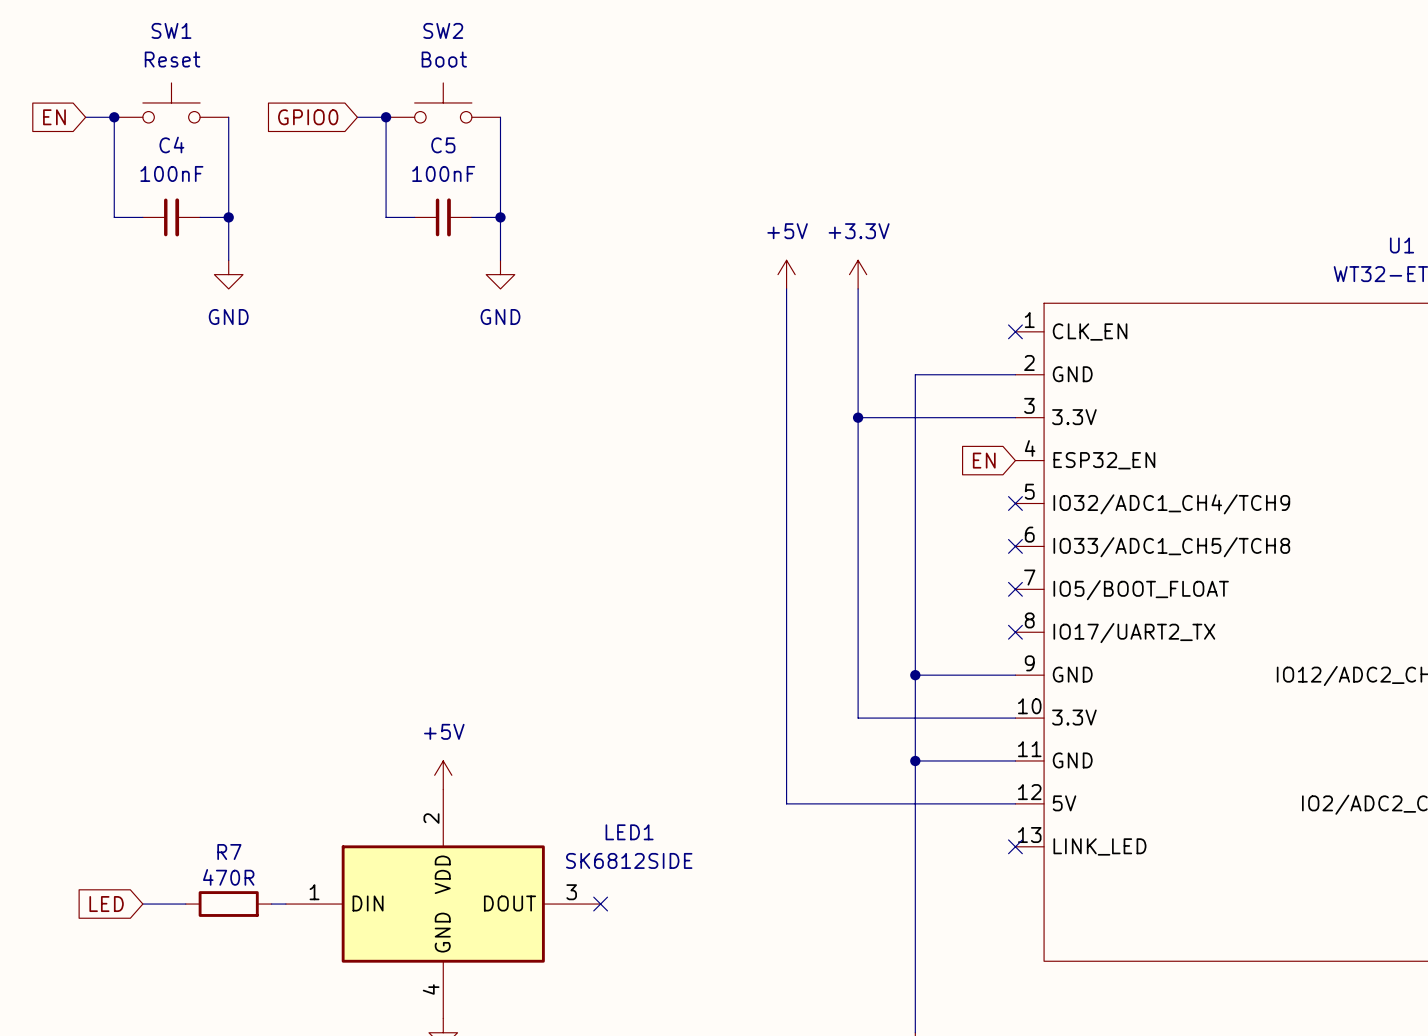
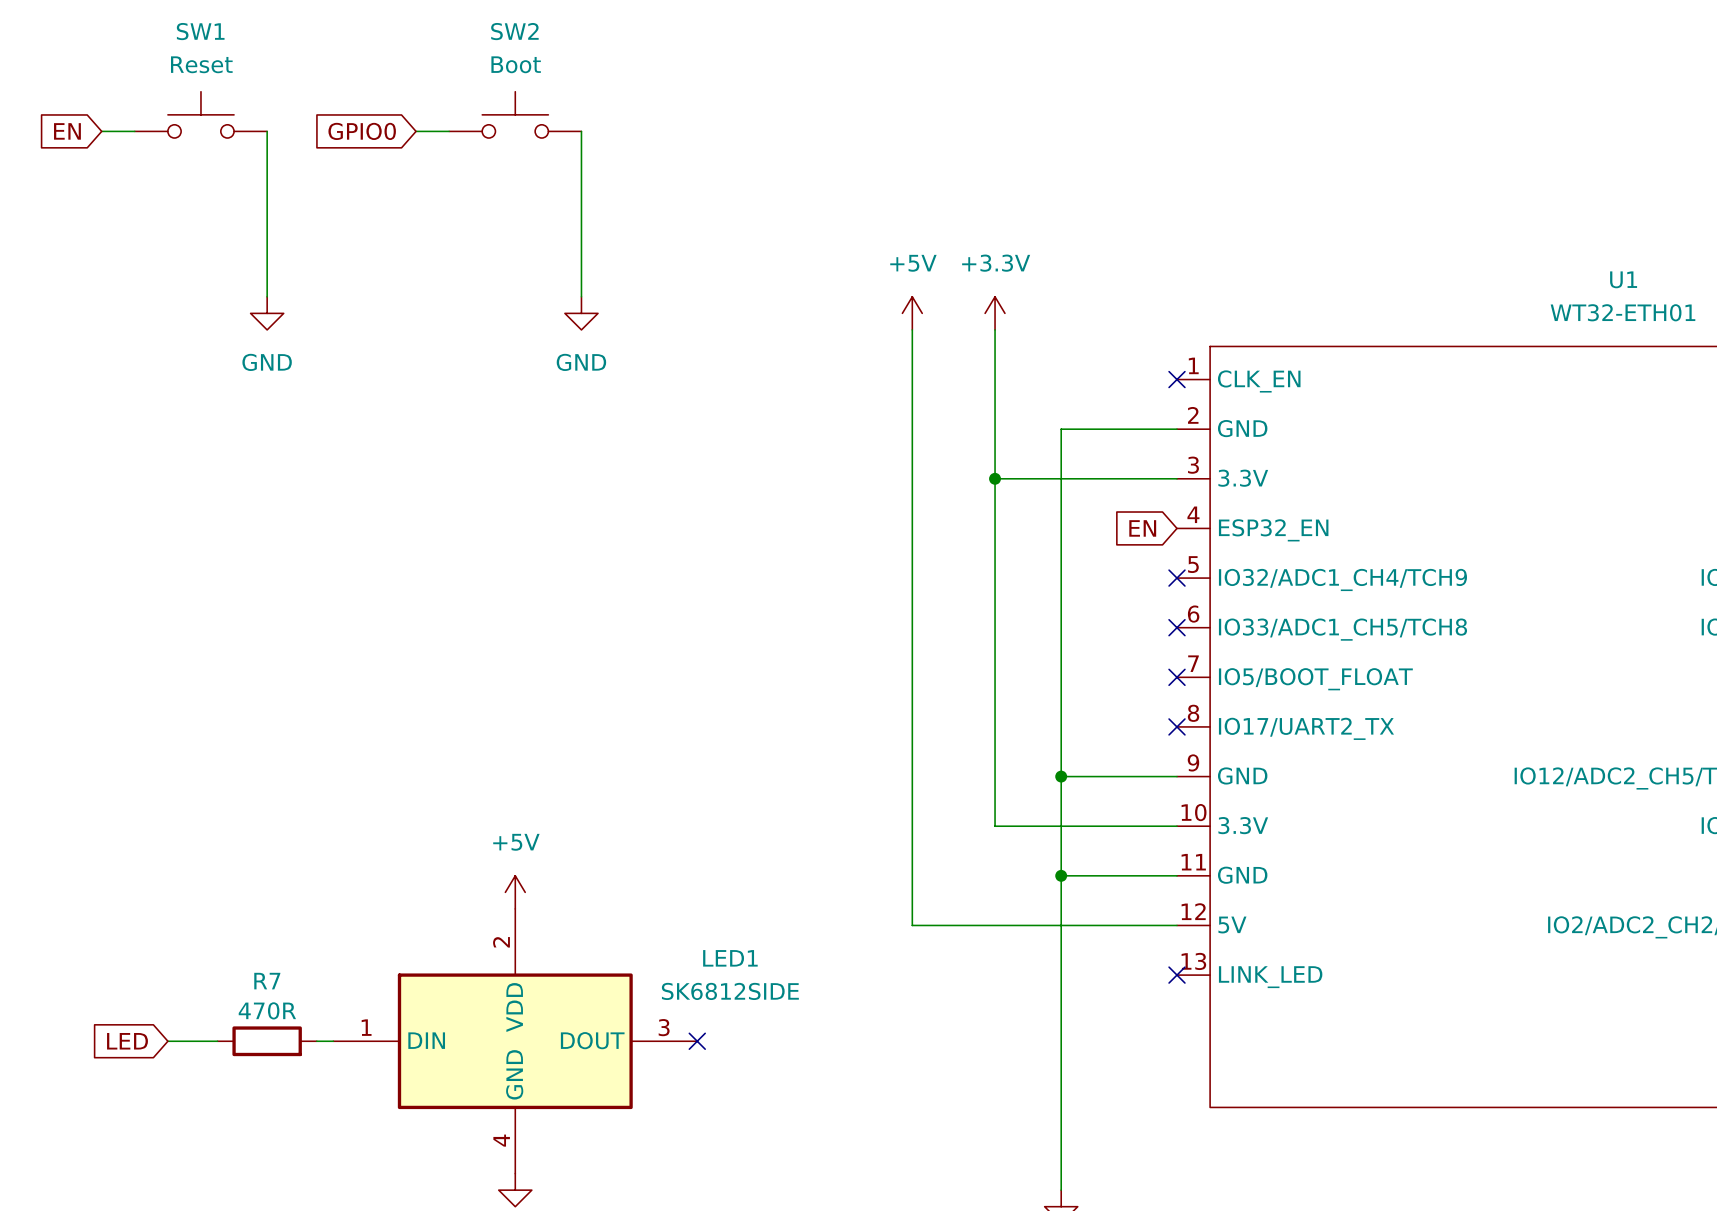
wire: (114, 117) (114, 217) (142, 217) -> none
junction: (114, 117) -> none
wire: (386, 117) (386, 217) (414, 217) -> none
junction: (386, 117) -> none
C4: 100nF (171, 217) -> none
wire: (200, 217) (228, 217) -> none
junction: (228, 217) -> none
C5: 100nF (443, 217) -> none
wire: (471, 217) (500, 217) -> none
junction: (500, 217) -> none

